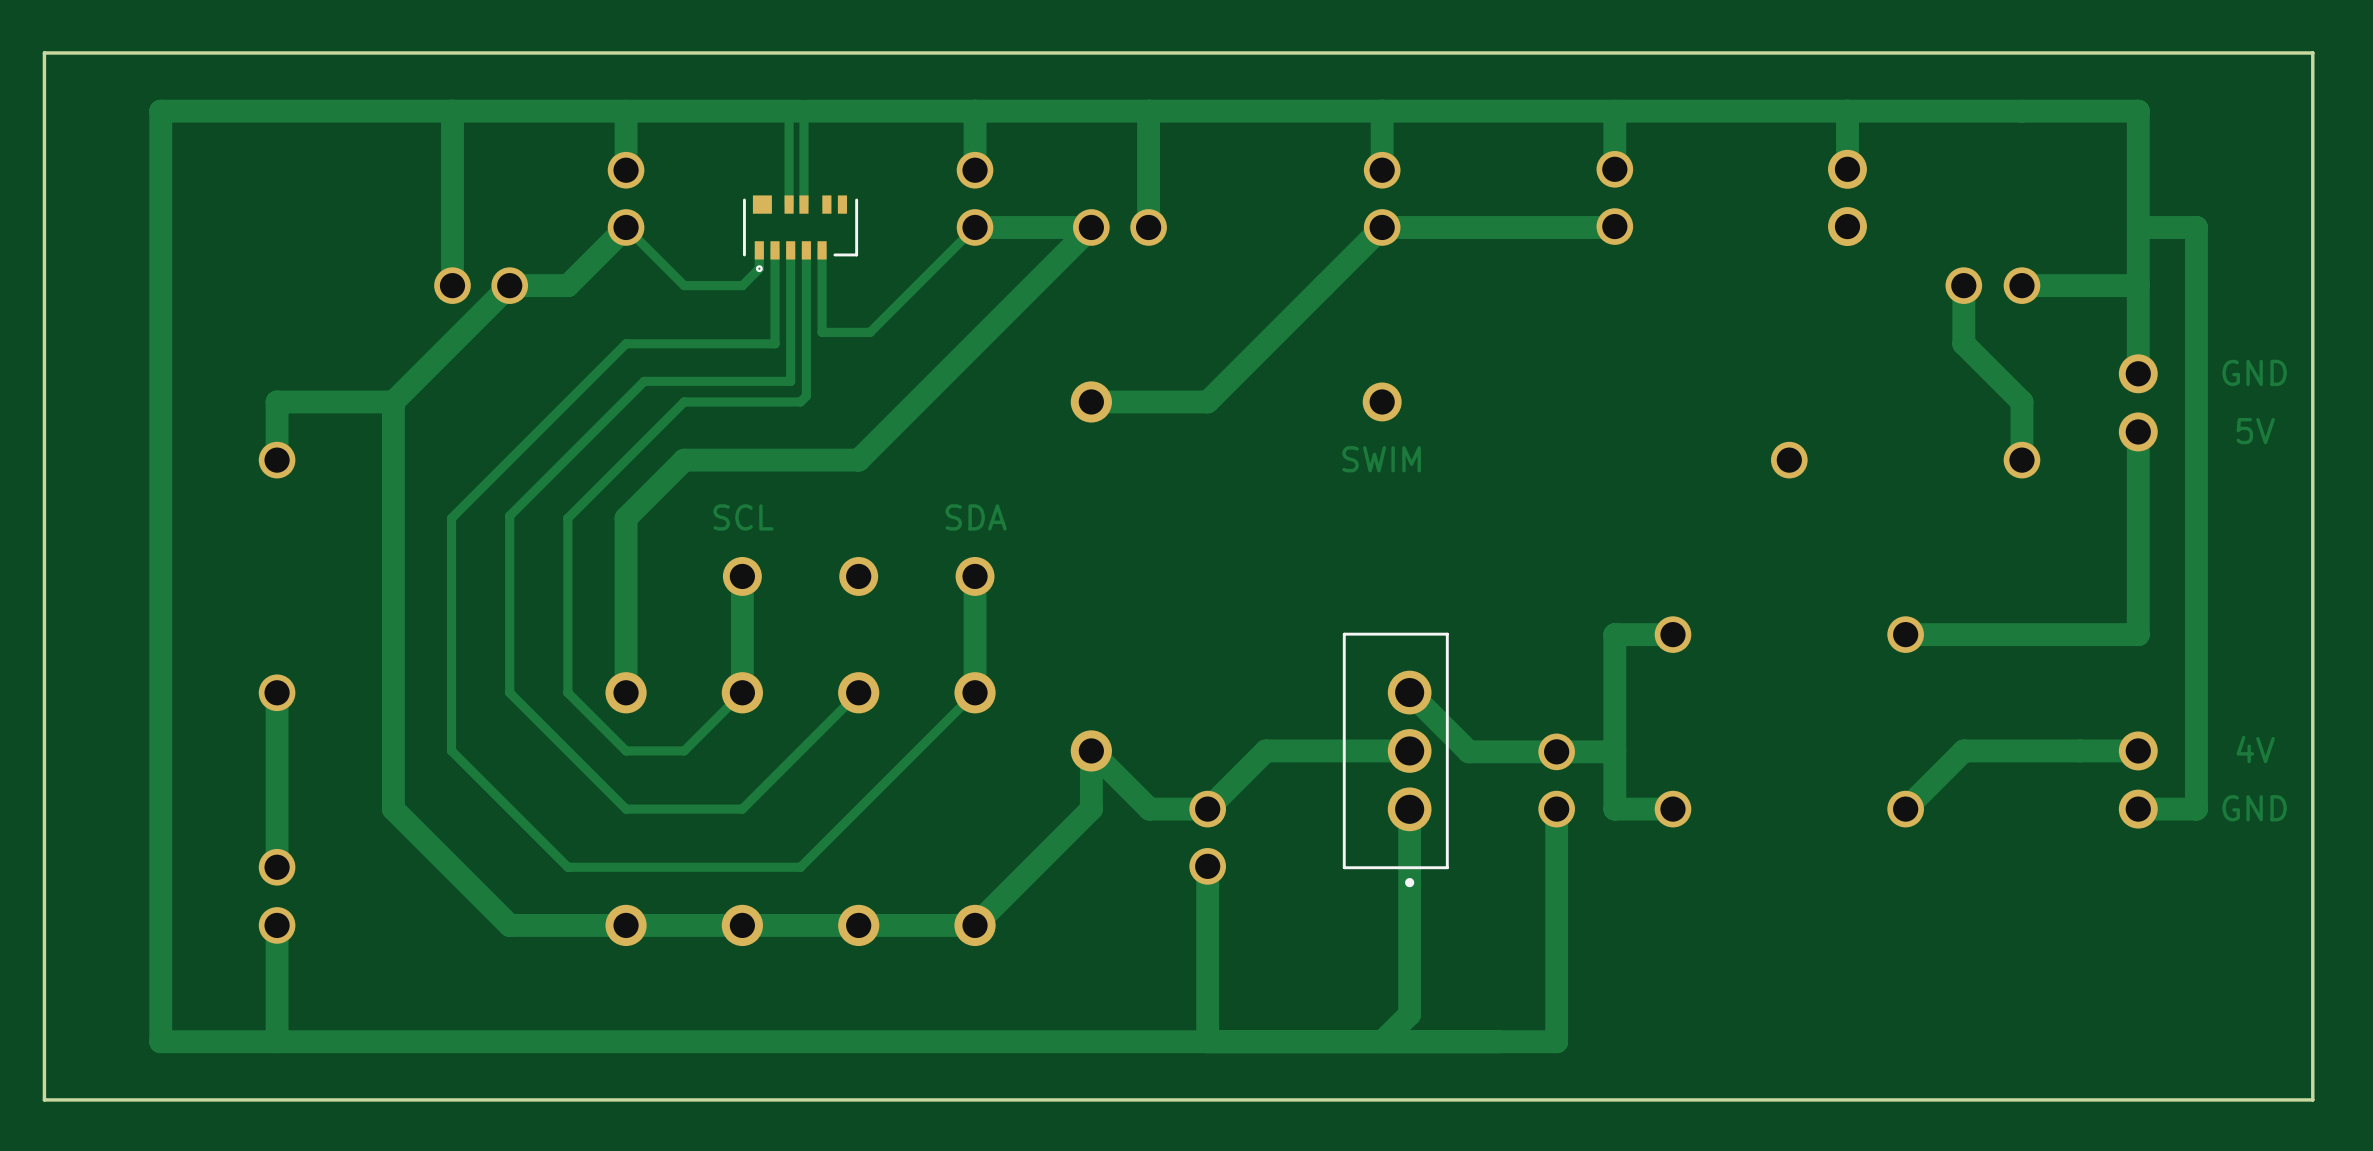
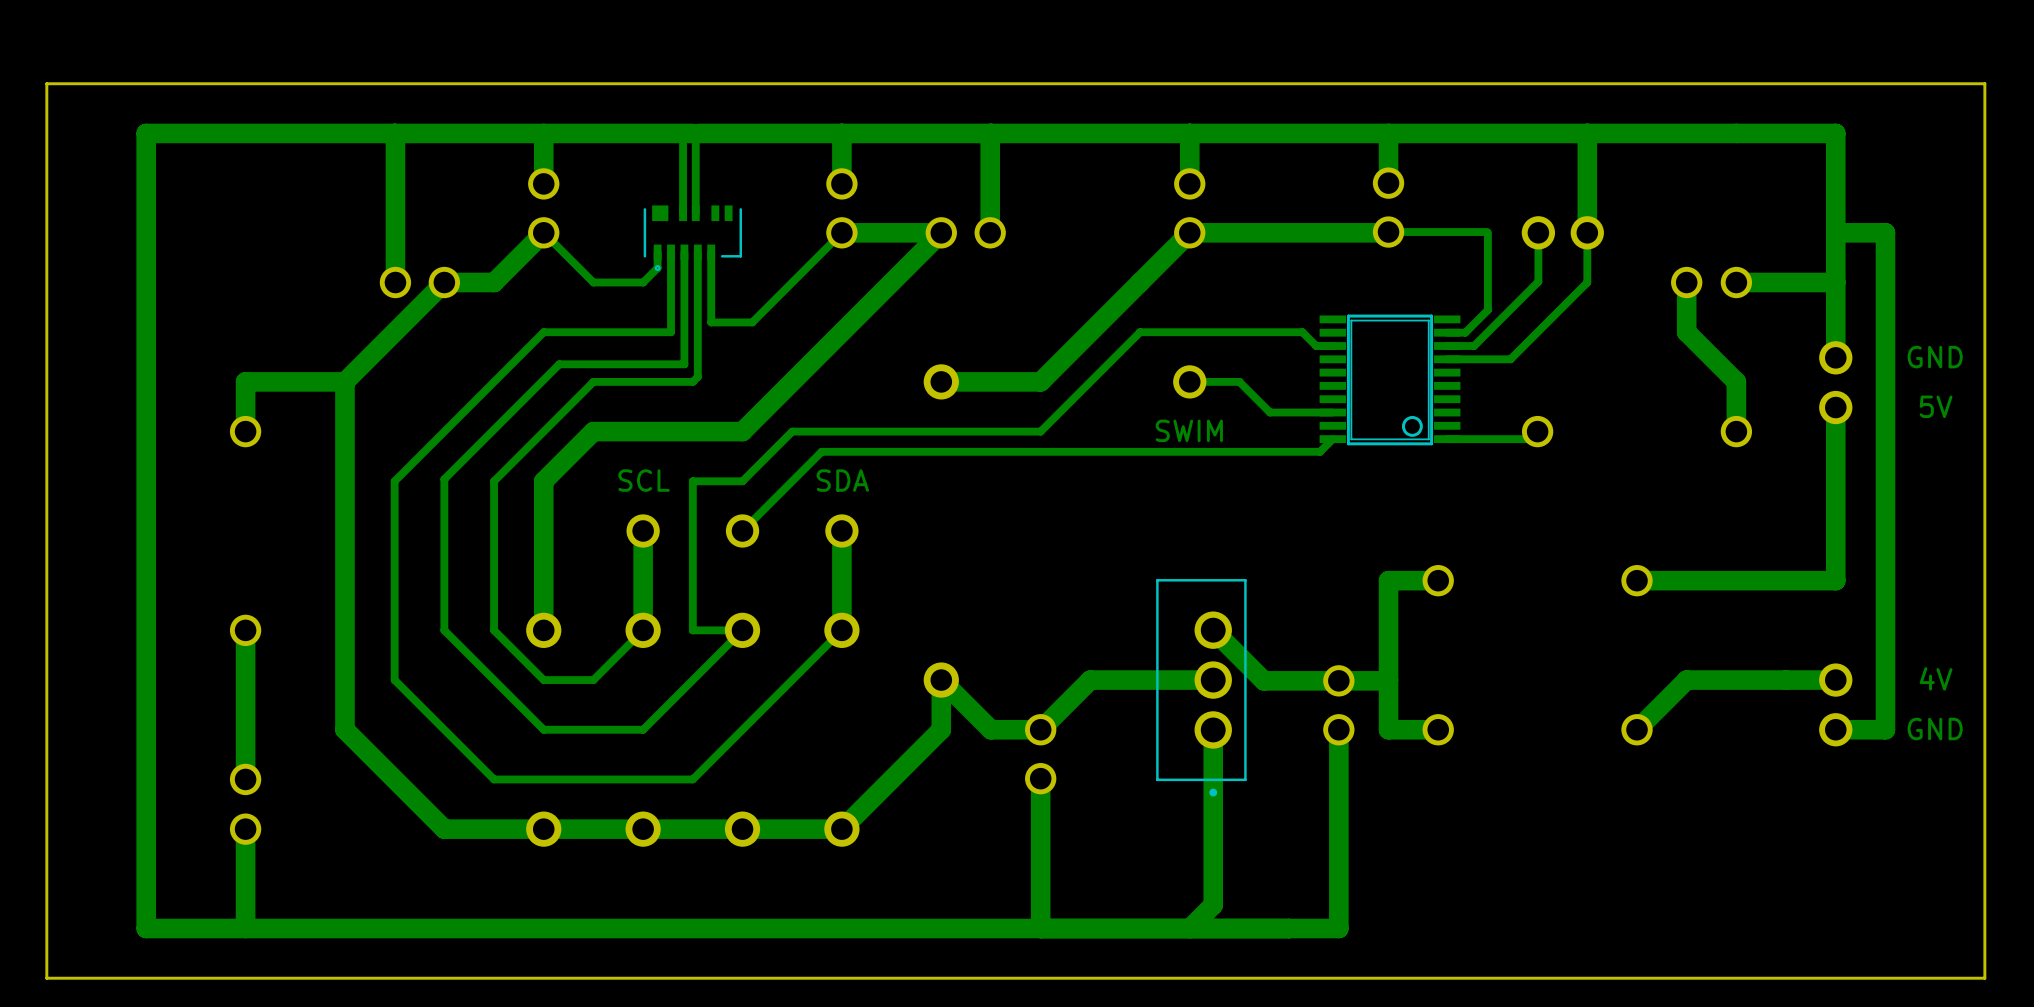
track: none -> (1587, 183) (1587, 232)
part rotation: 0° (1847, 197) -> 90° clockwise (1562, 232)
track: none -> (1388, 232) (1487, 232) (1487, 310) (1465, 332) (1447, 332)
track: none -> (1538, 232) (1538, 281) (1474, 346) (1447, 346)
track: none -> (1587, 245) (1587, 282) (1510, 359) (1447, 359)
track: none -> (1332, 346) (1316, 346) (1302, 332) (1140, 332) (1040, 431) (792, 431) (742, 481) (692, 481) (692, 630) (742, 630)
part: none -> (1390, 379)
track: none -> (1189, 381) (1239, 381) (1270, 412) (1332, 412)
track: none -> (1537, 431) (1530, 439) (1447, 439)
track: none -> (1332, 439) (1320, 451) (821, 451) (742, 530)

